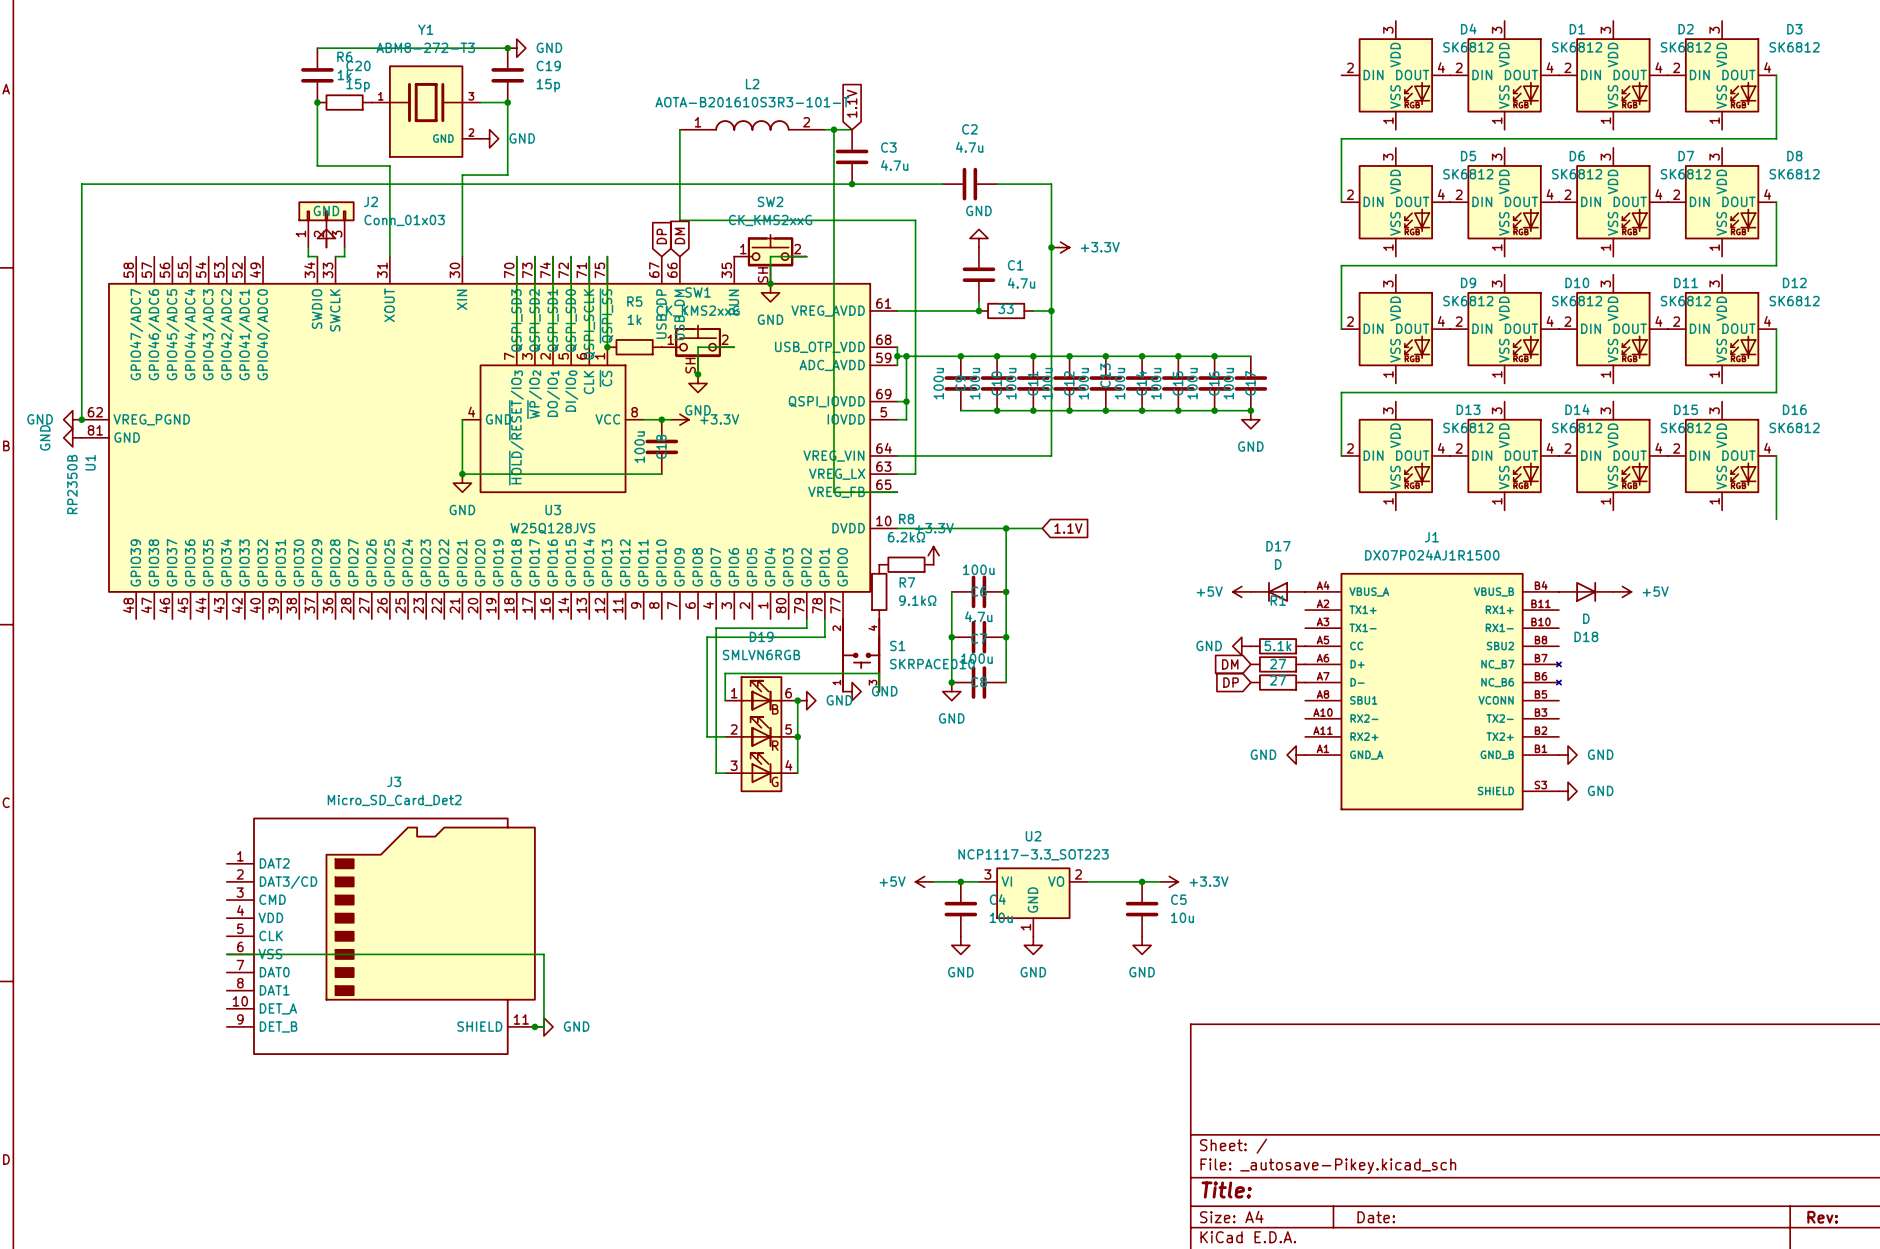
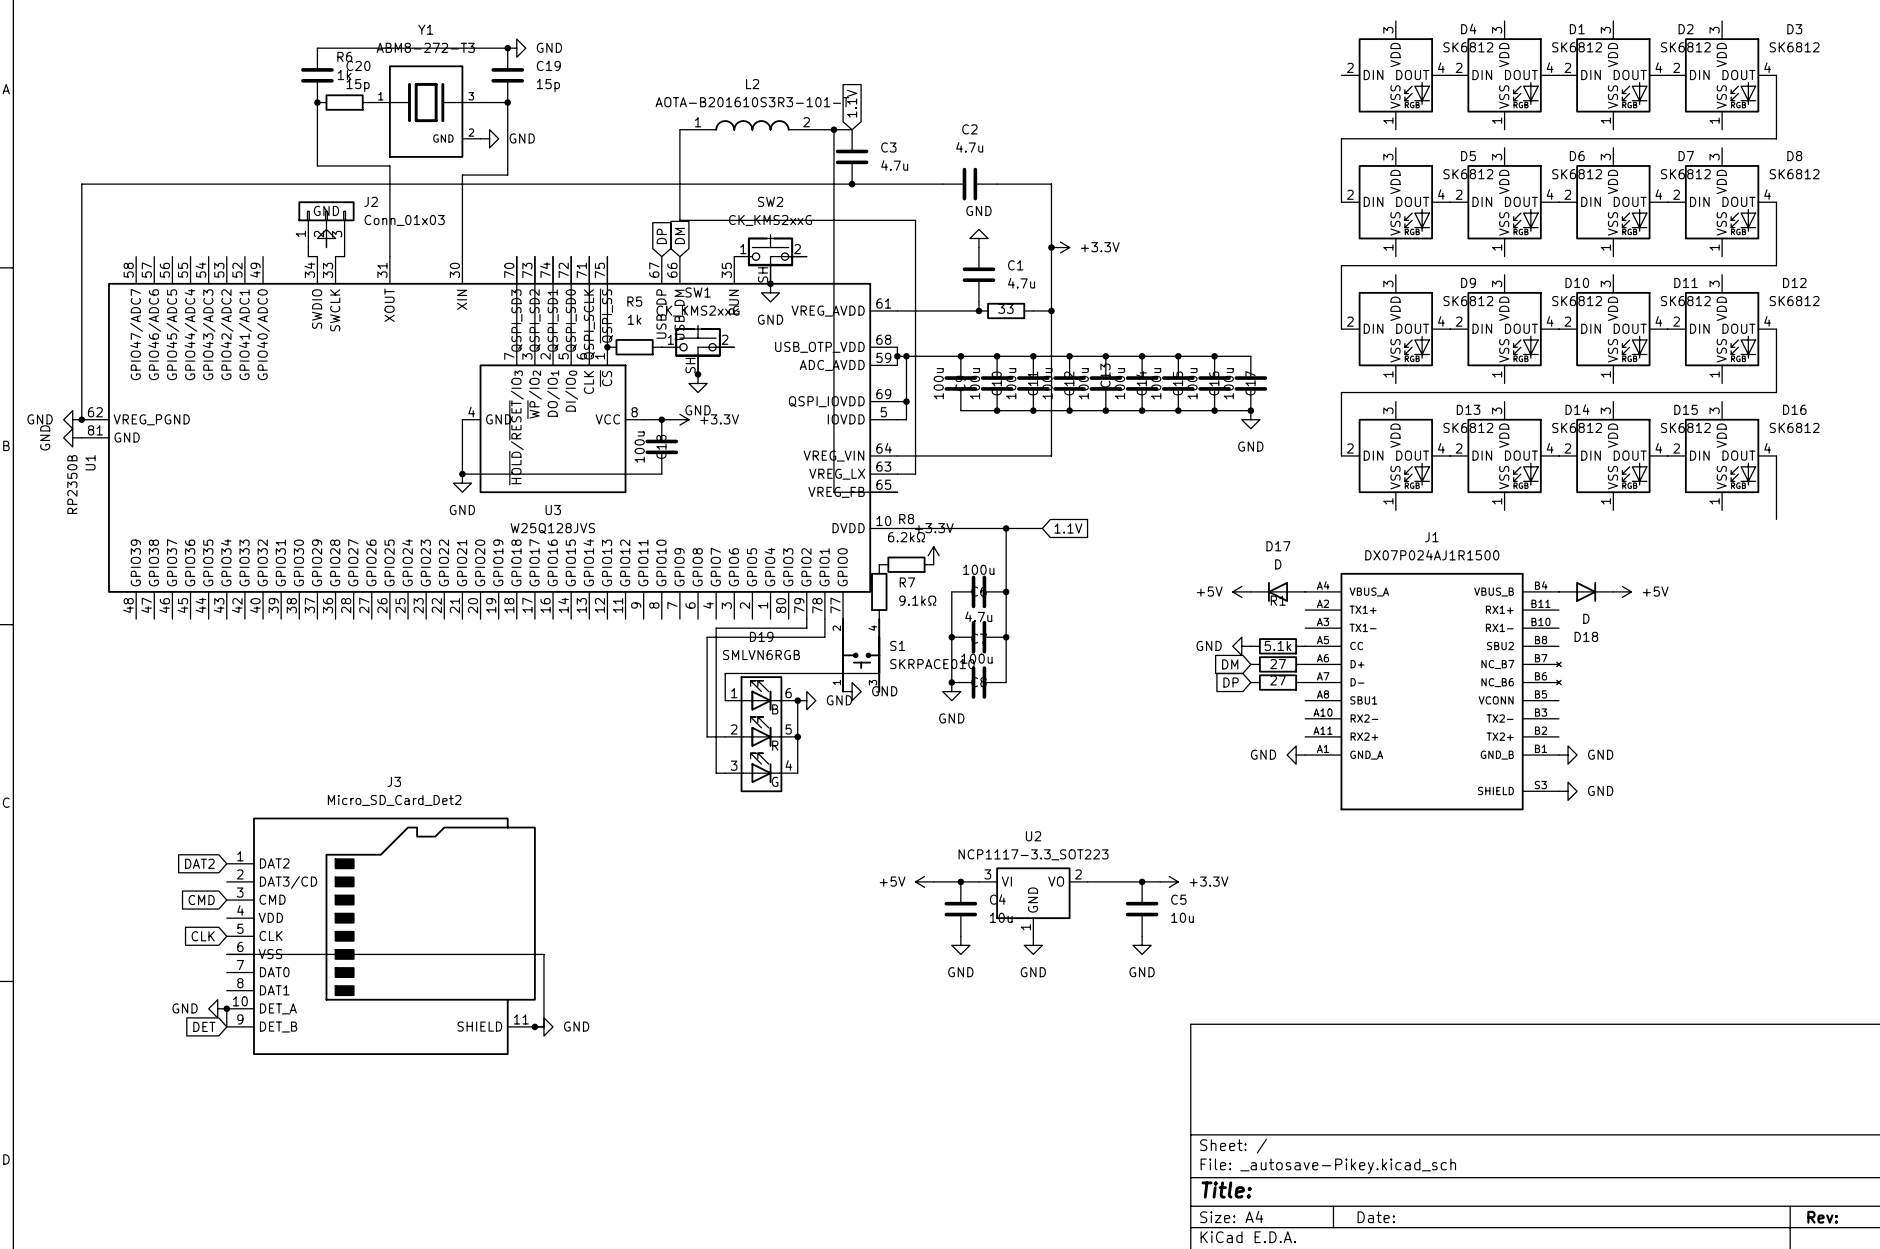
global label: none -> DAT2 (199, 863)
global label: none -> CMD (201, 900)
global label: none -> CLK (203, 936)
power symbol: none -> GND (217, 1008)
wire: none -> (226, 1008) (226, 1026)
junction: none -> (226, 1008)
global label: none -> DET (204, 1026)

